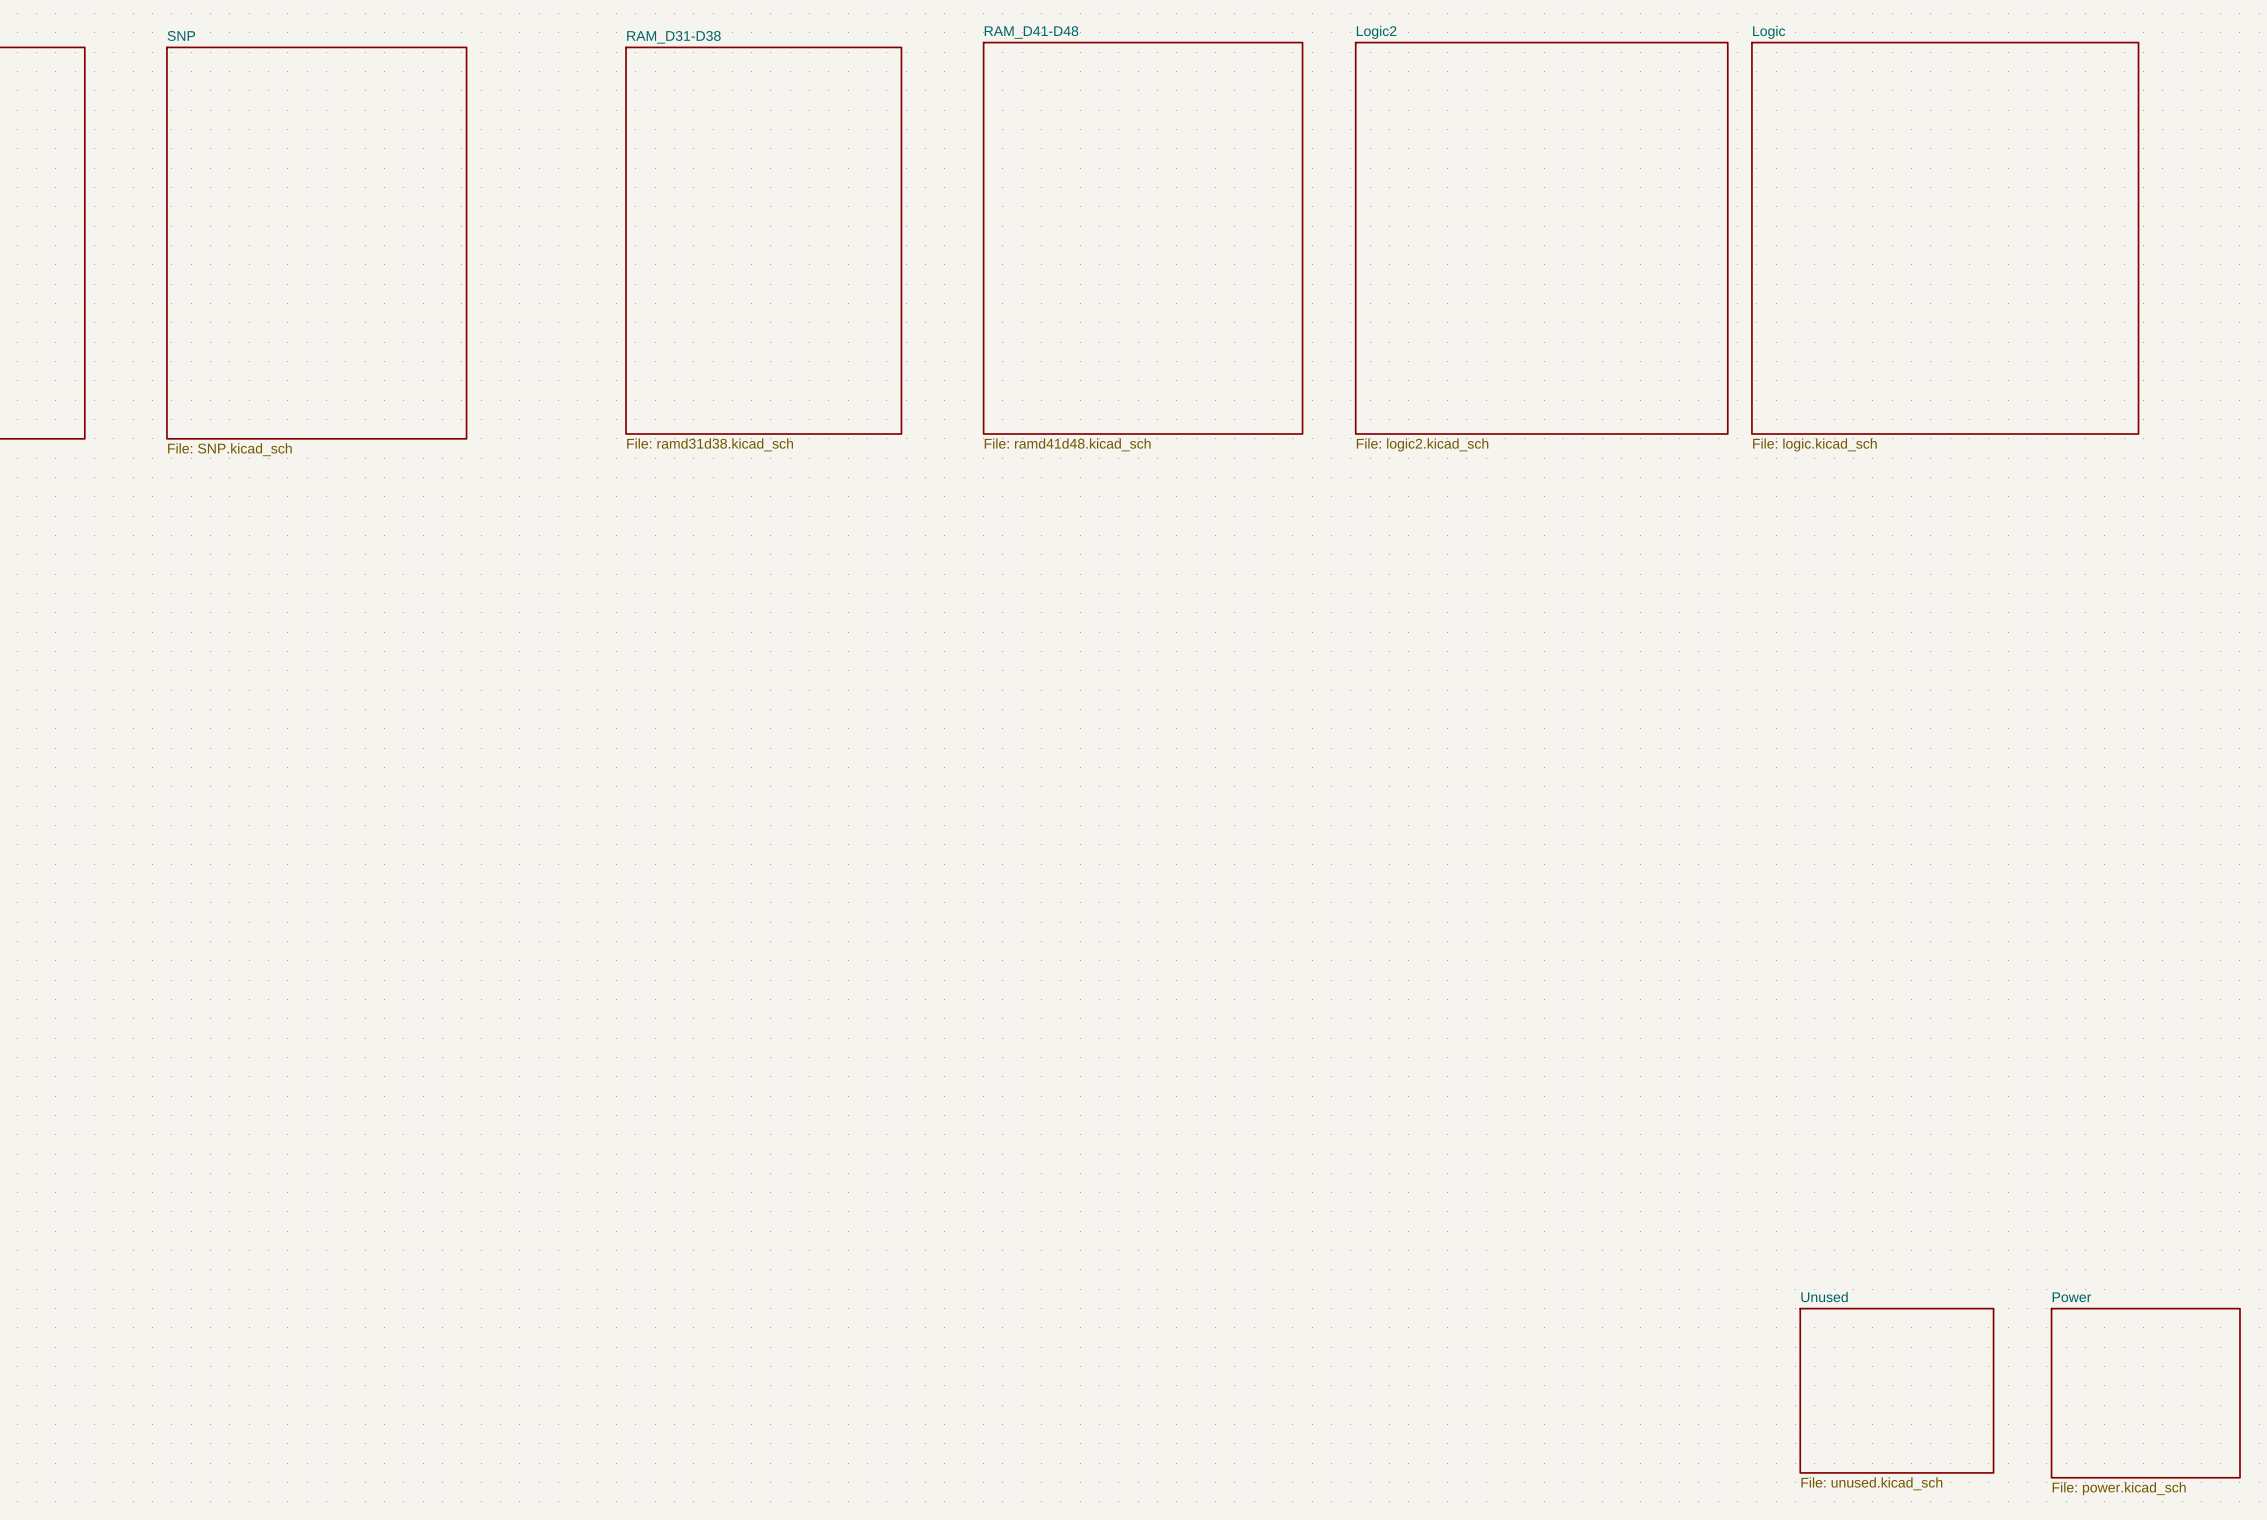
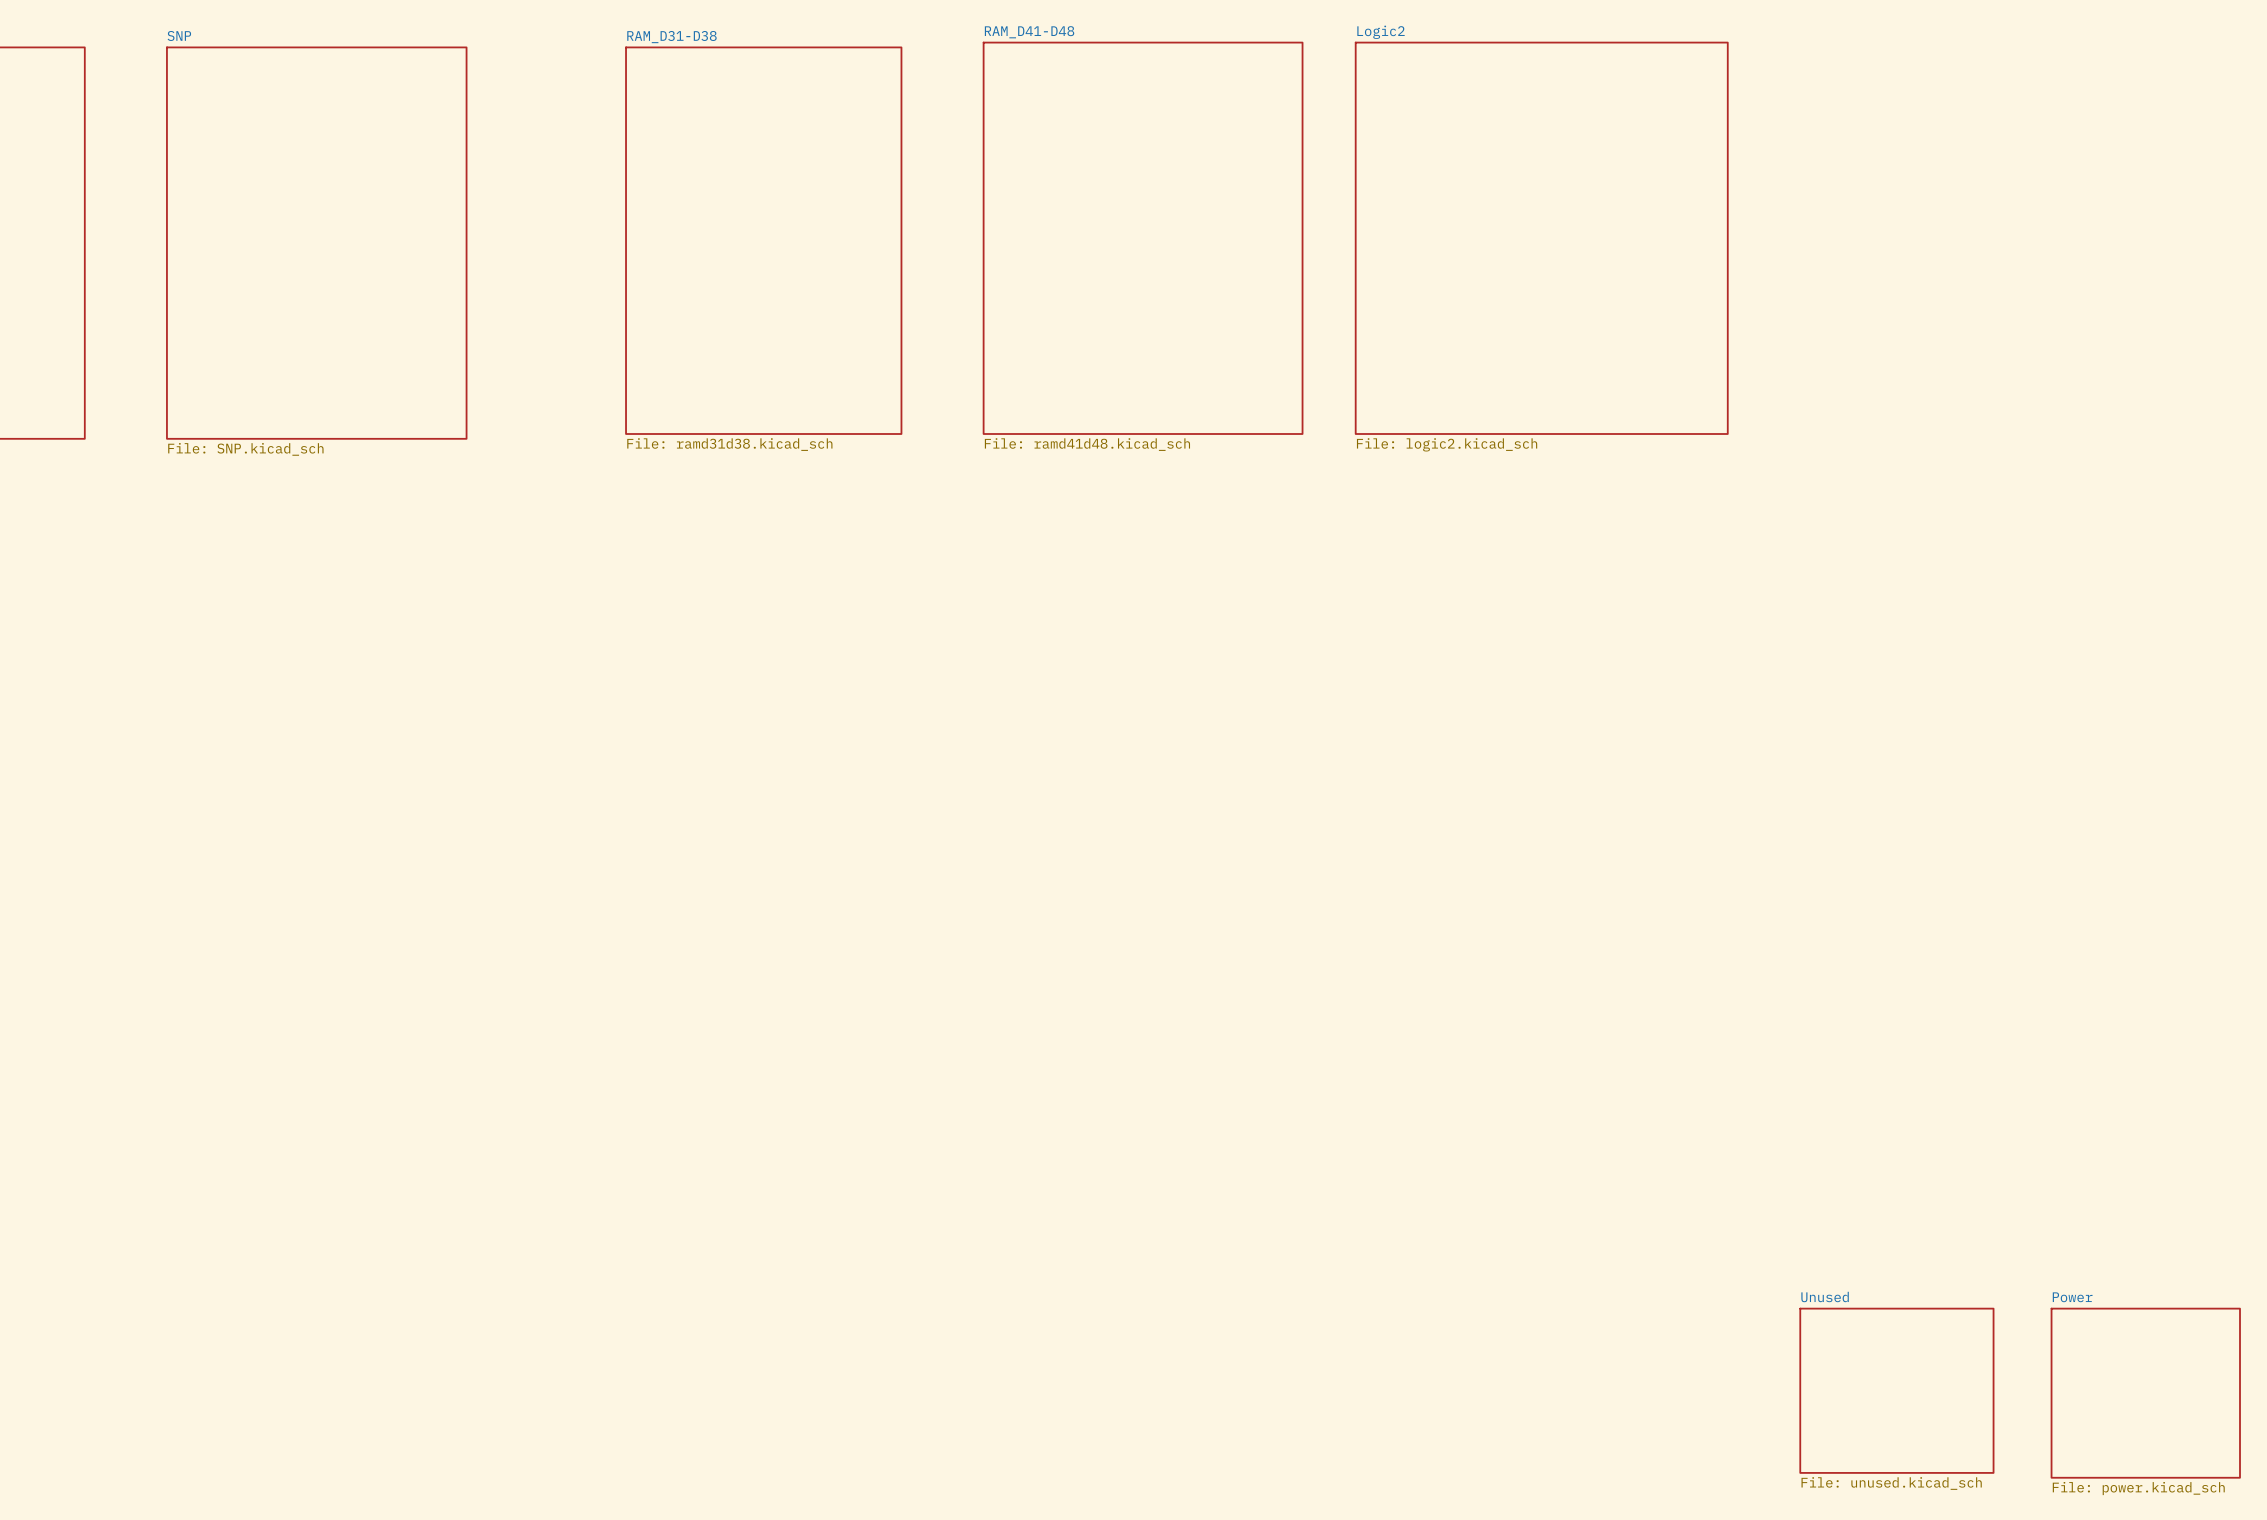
sheet Logic: File: logic.kicad_sch (1945, 238) -> none

